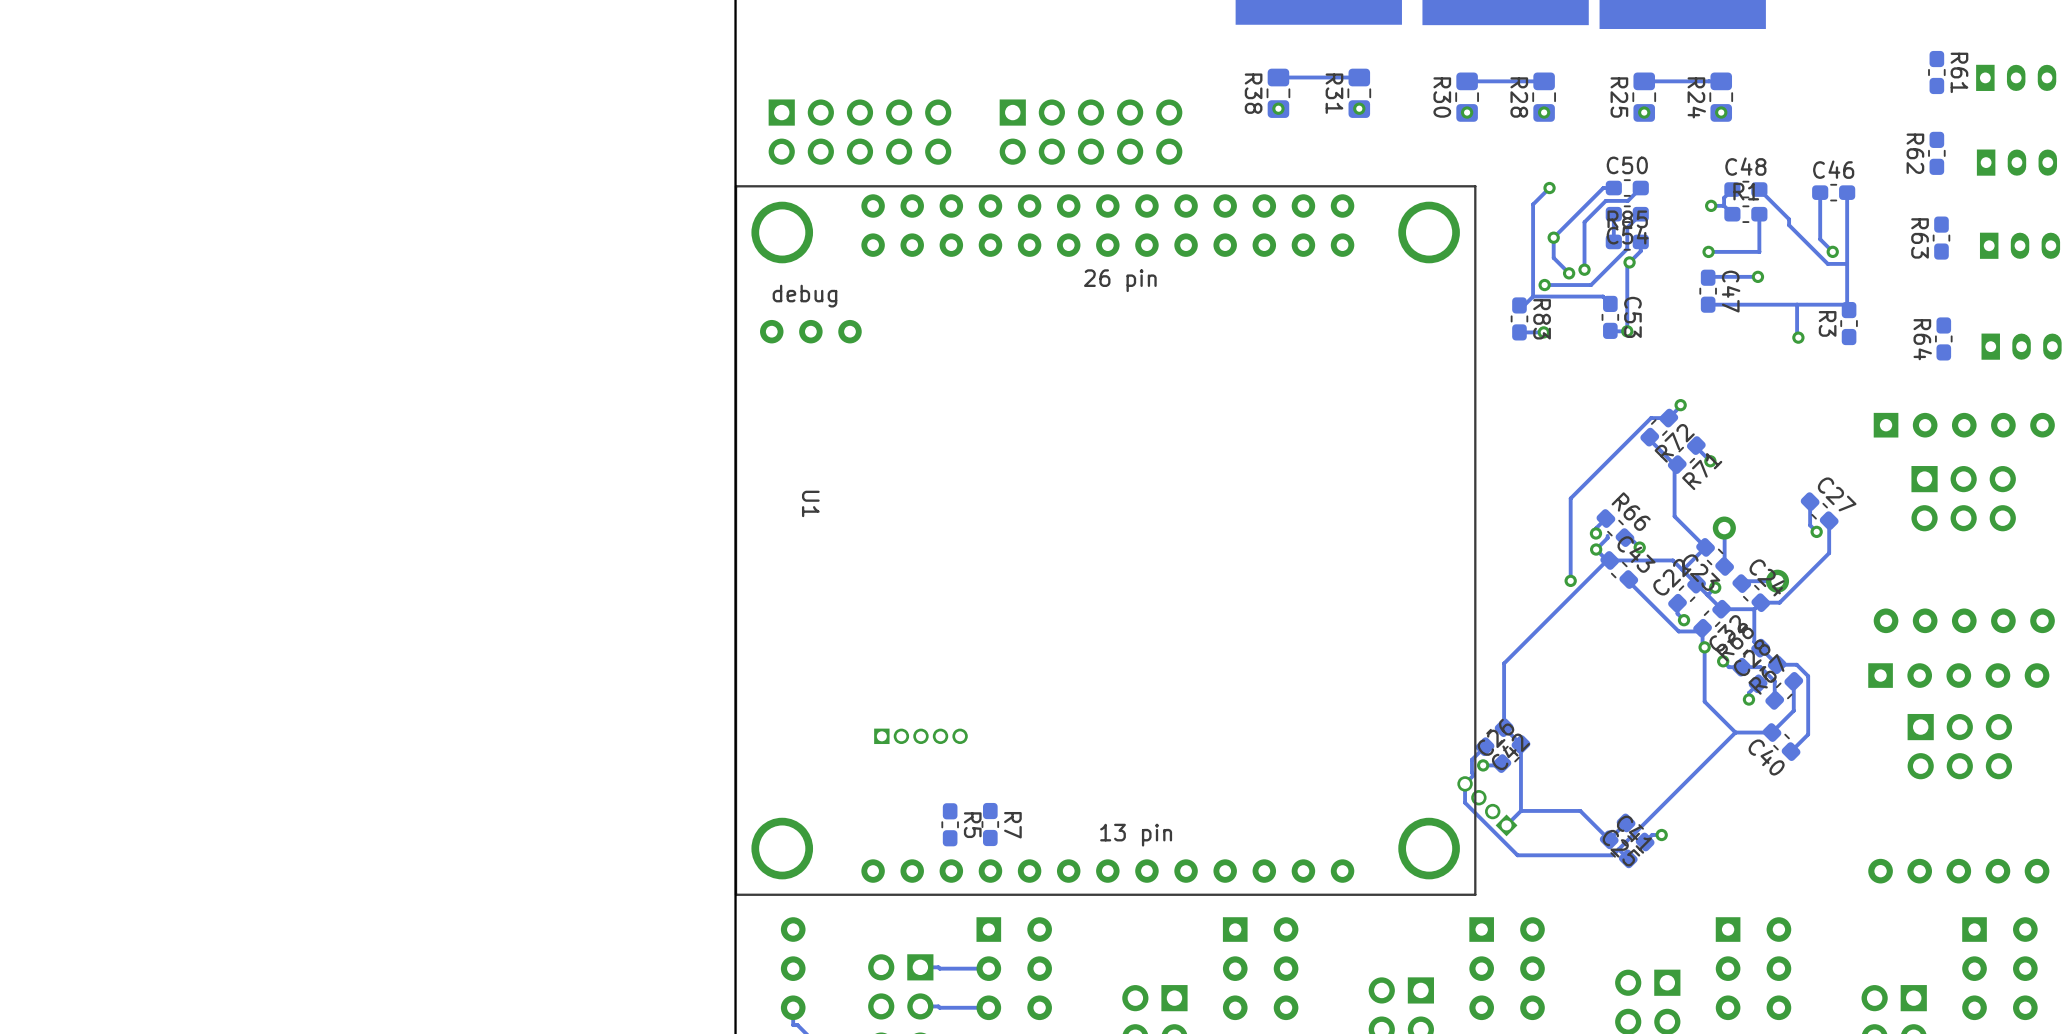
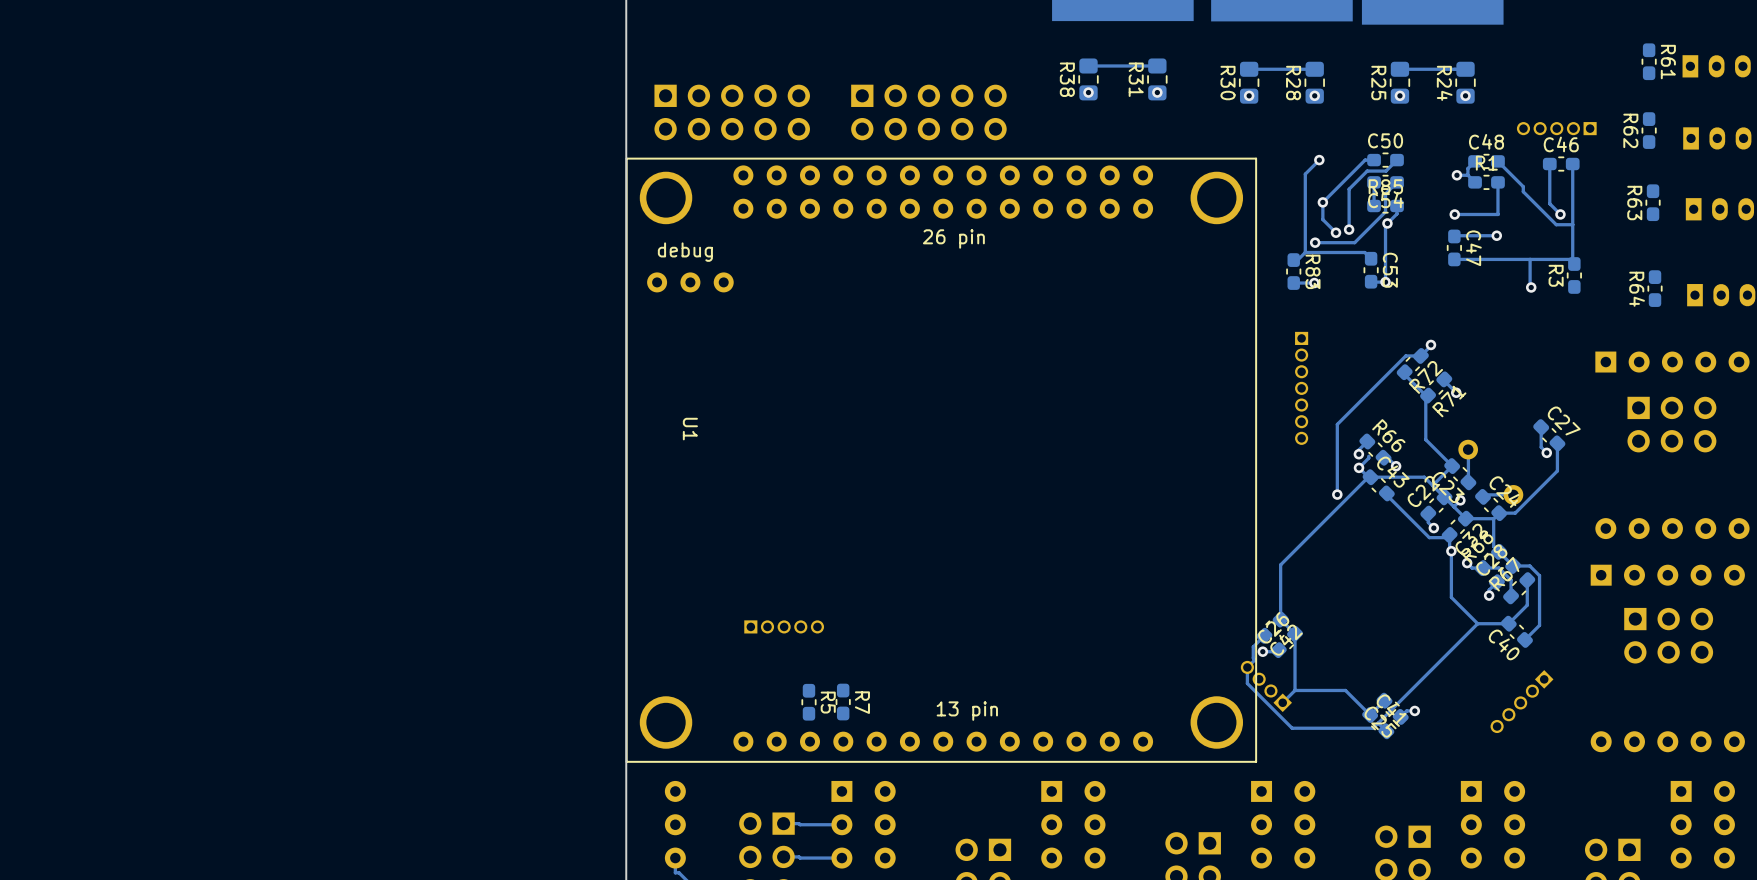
part: none -> (1556, 128)
part: none -> (1301, 388)
part: none -> (1522, 701)

